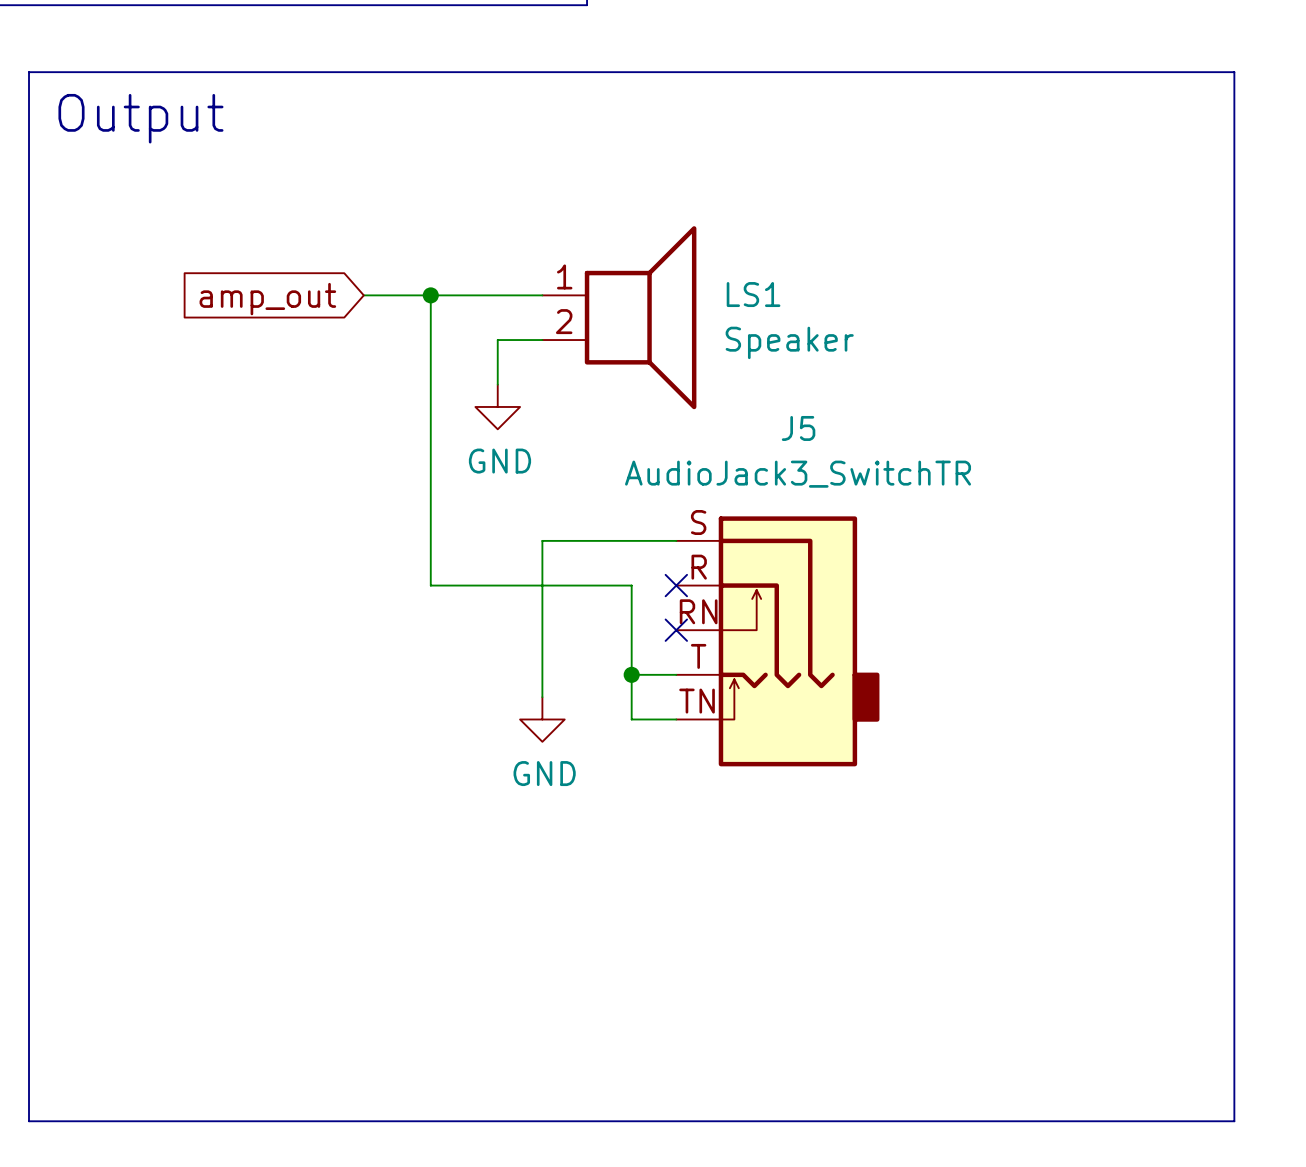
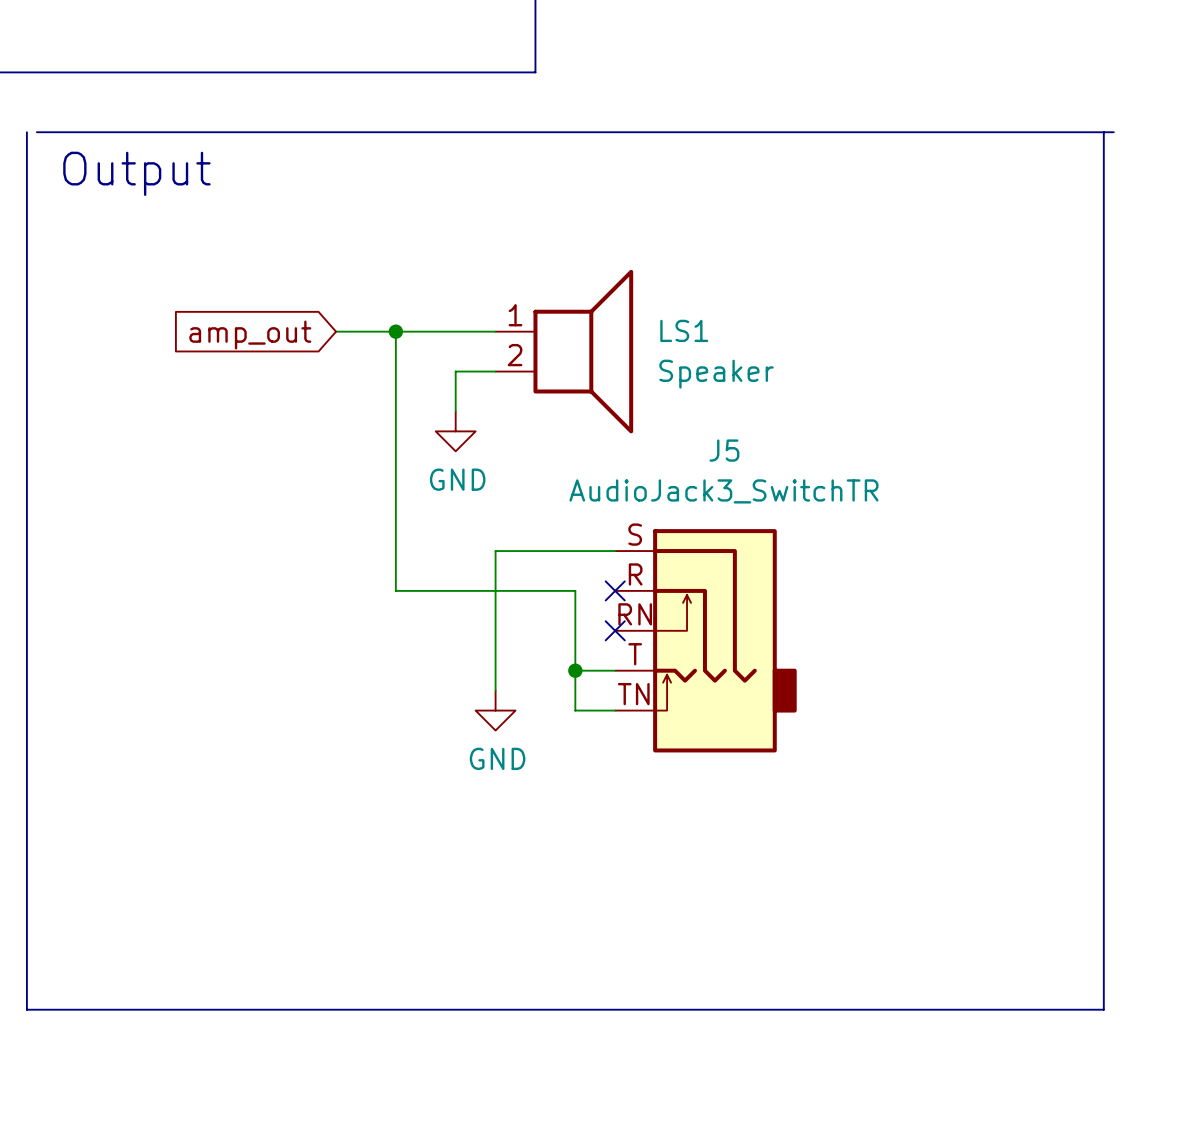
line: none -> (26, 132) (26, 1009) (1103, 1009) (1103, 132)
line: (29, 72) (29, 1121) (1234, 1121) (1234, 72) -> none

